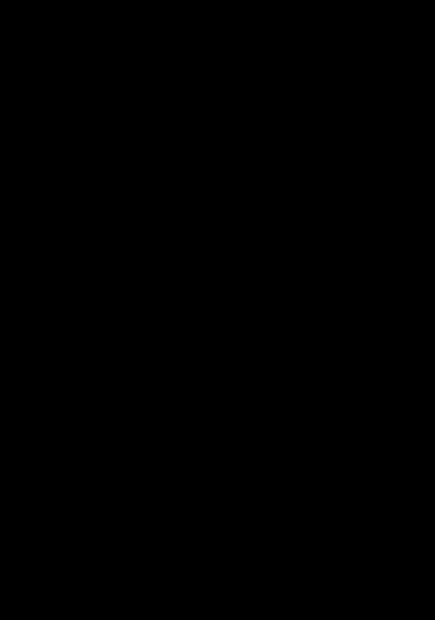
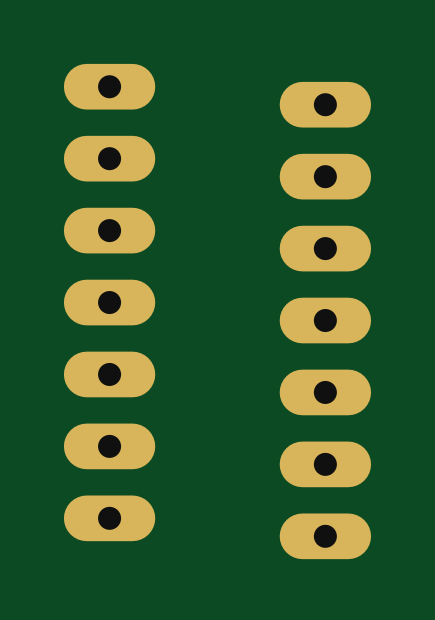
part: none -> (109, 302)
part: none -> (325, 320)

